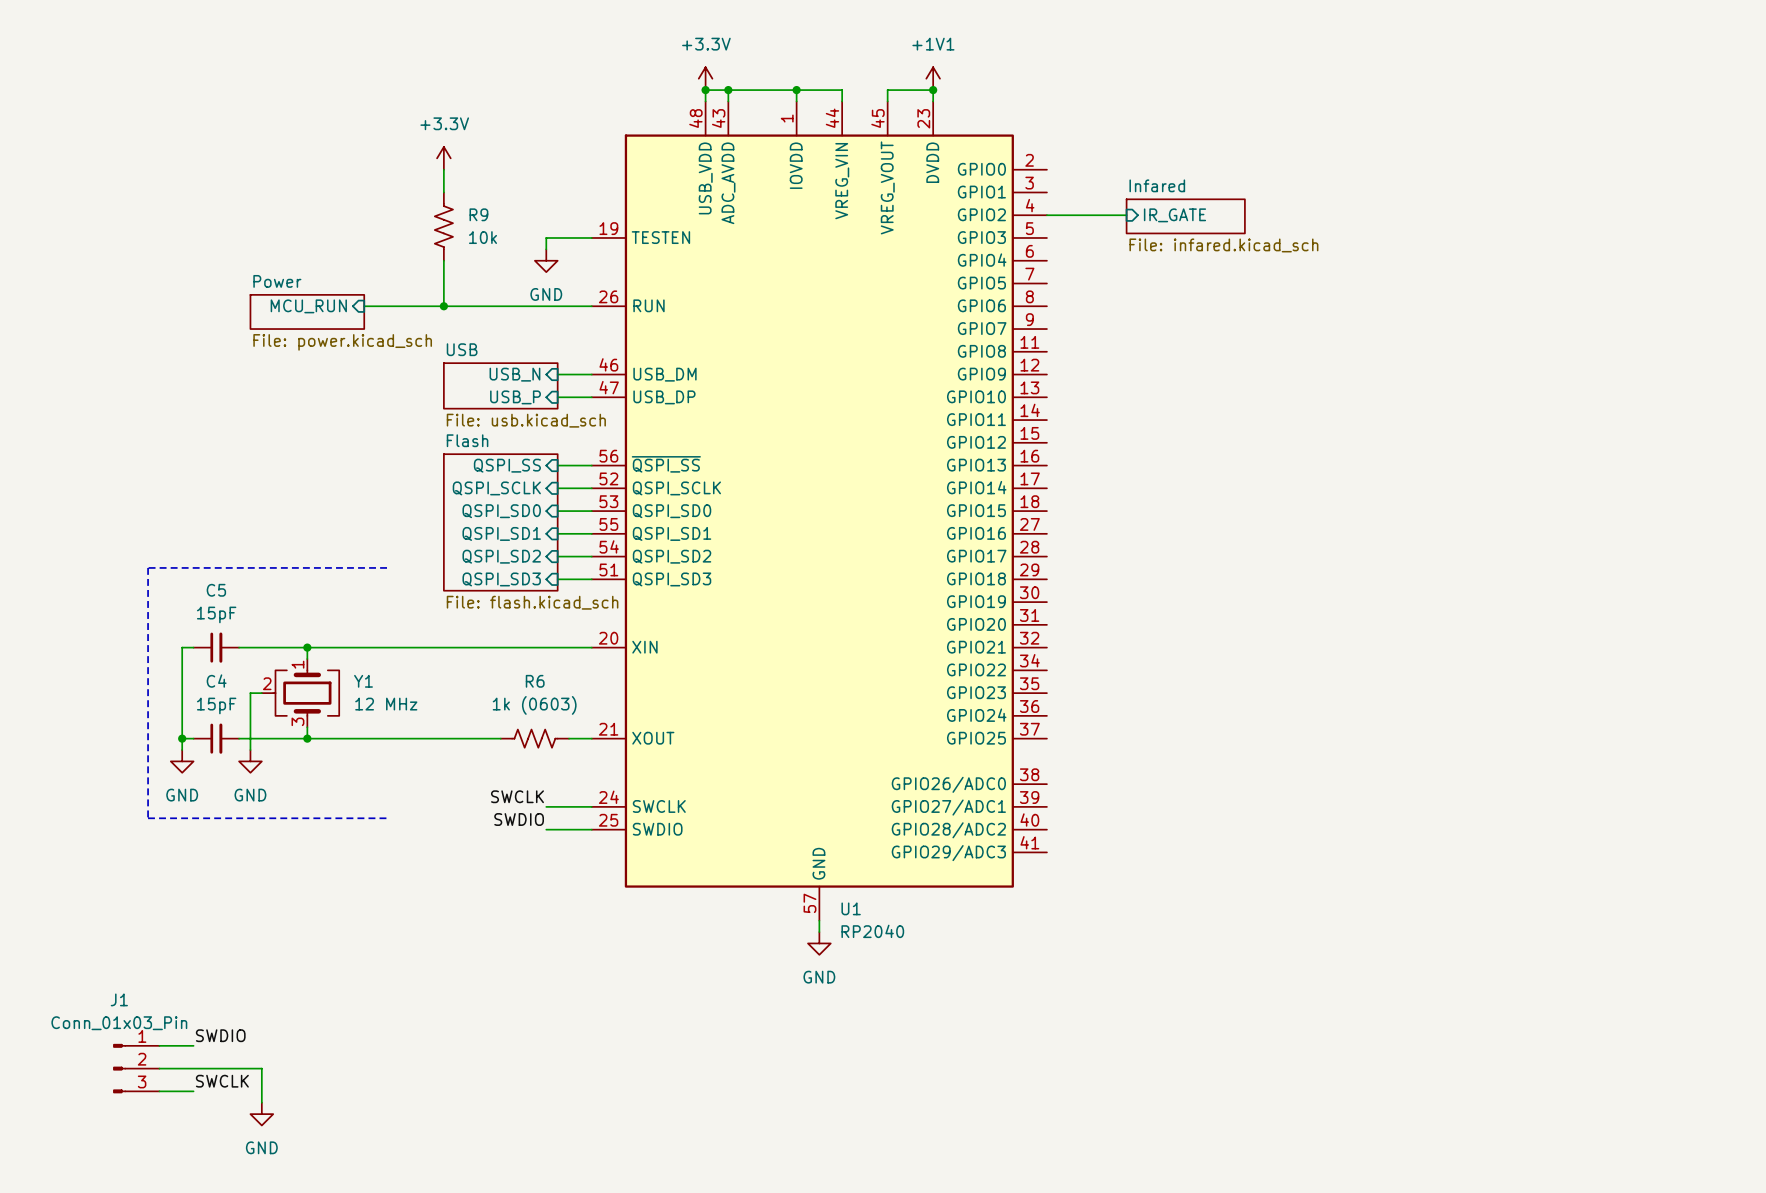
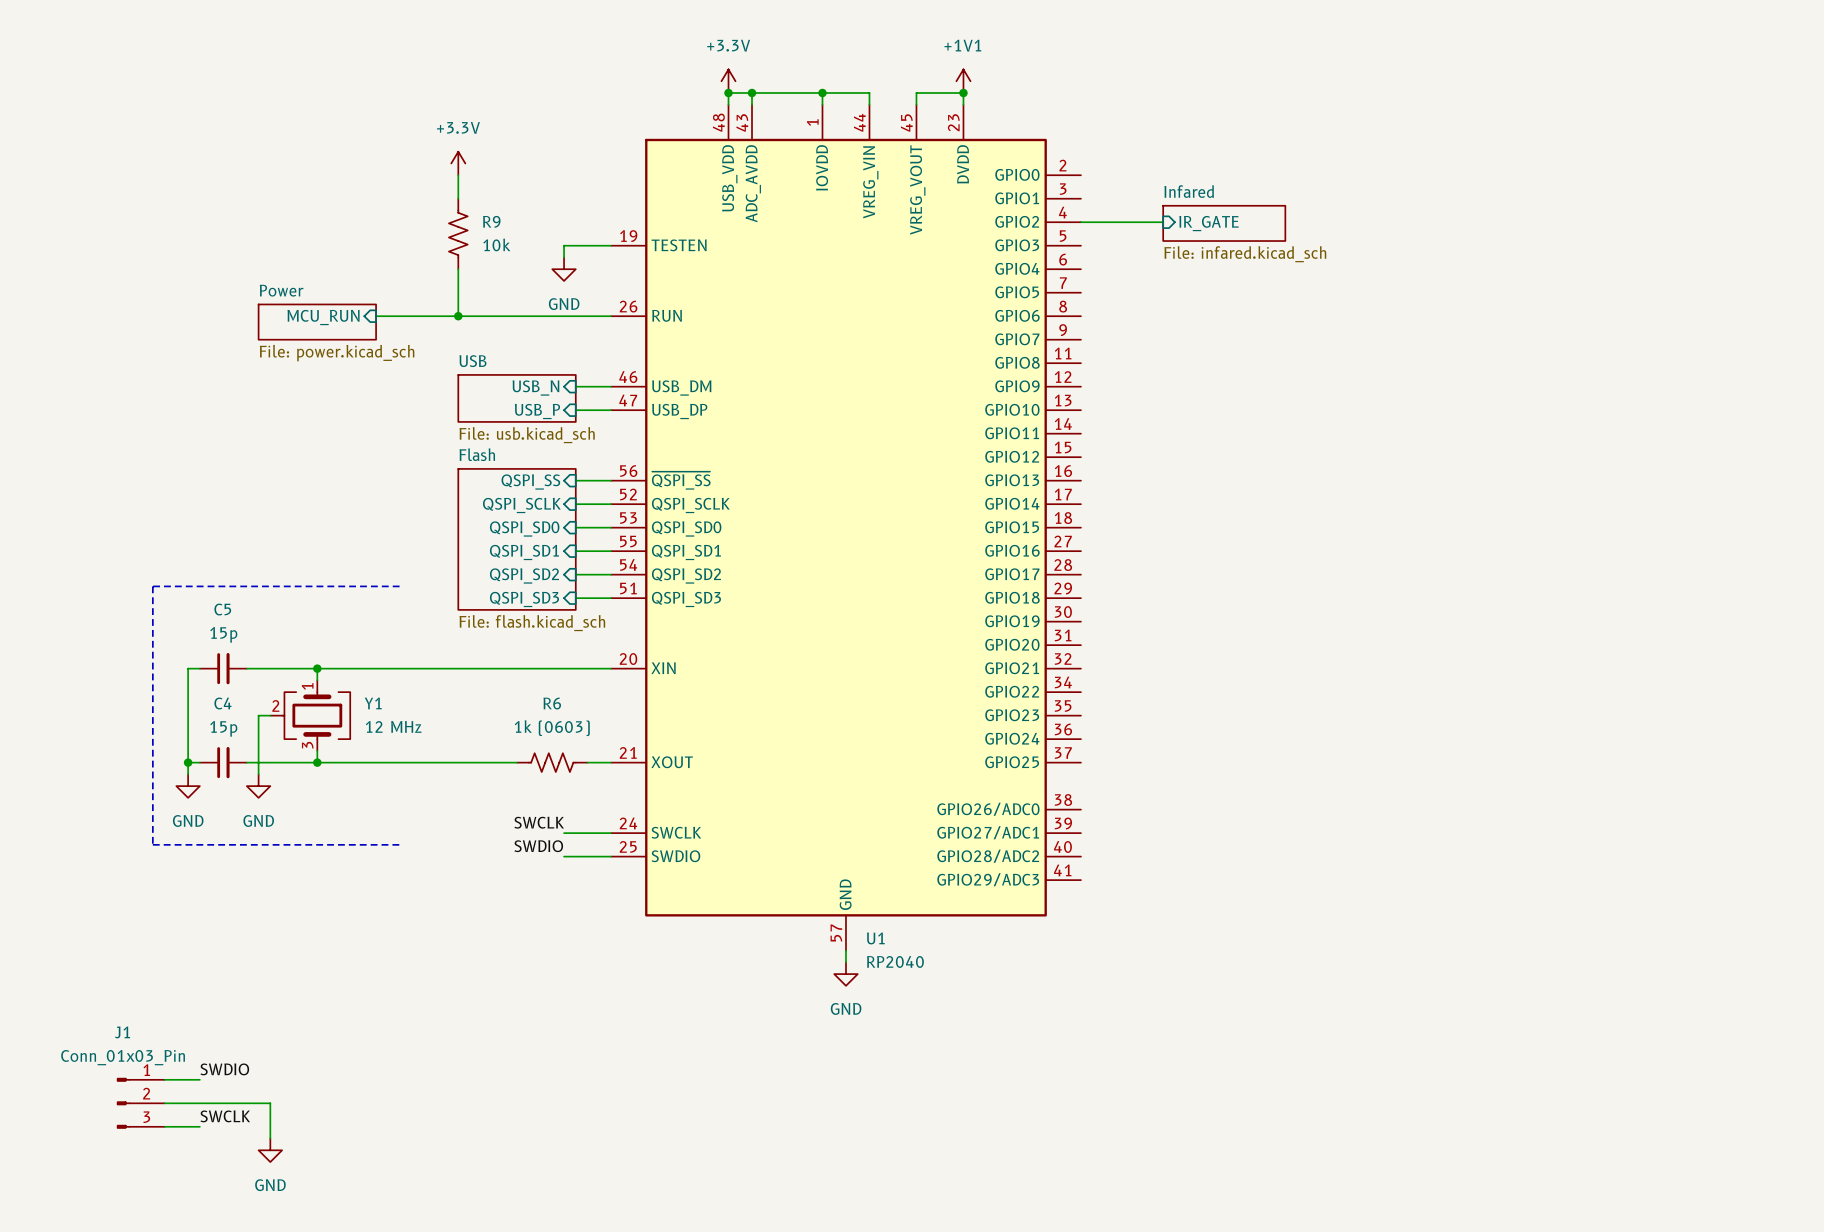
C5 value: 15pF (216, 614) -> 15p (223, 634)
C4 value: 15pF (216, 705) -> 15p (223, 728)

